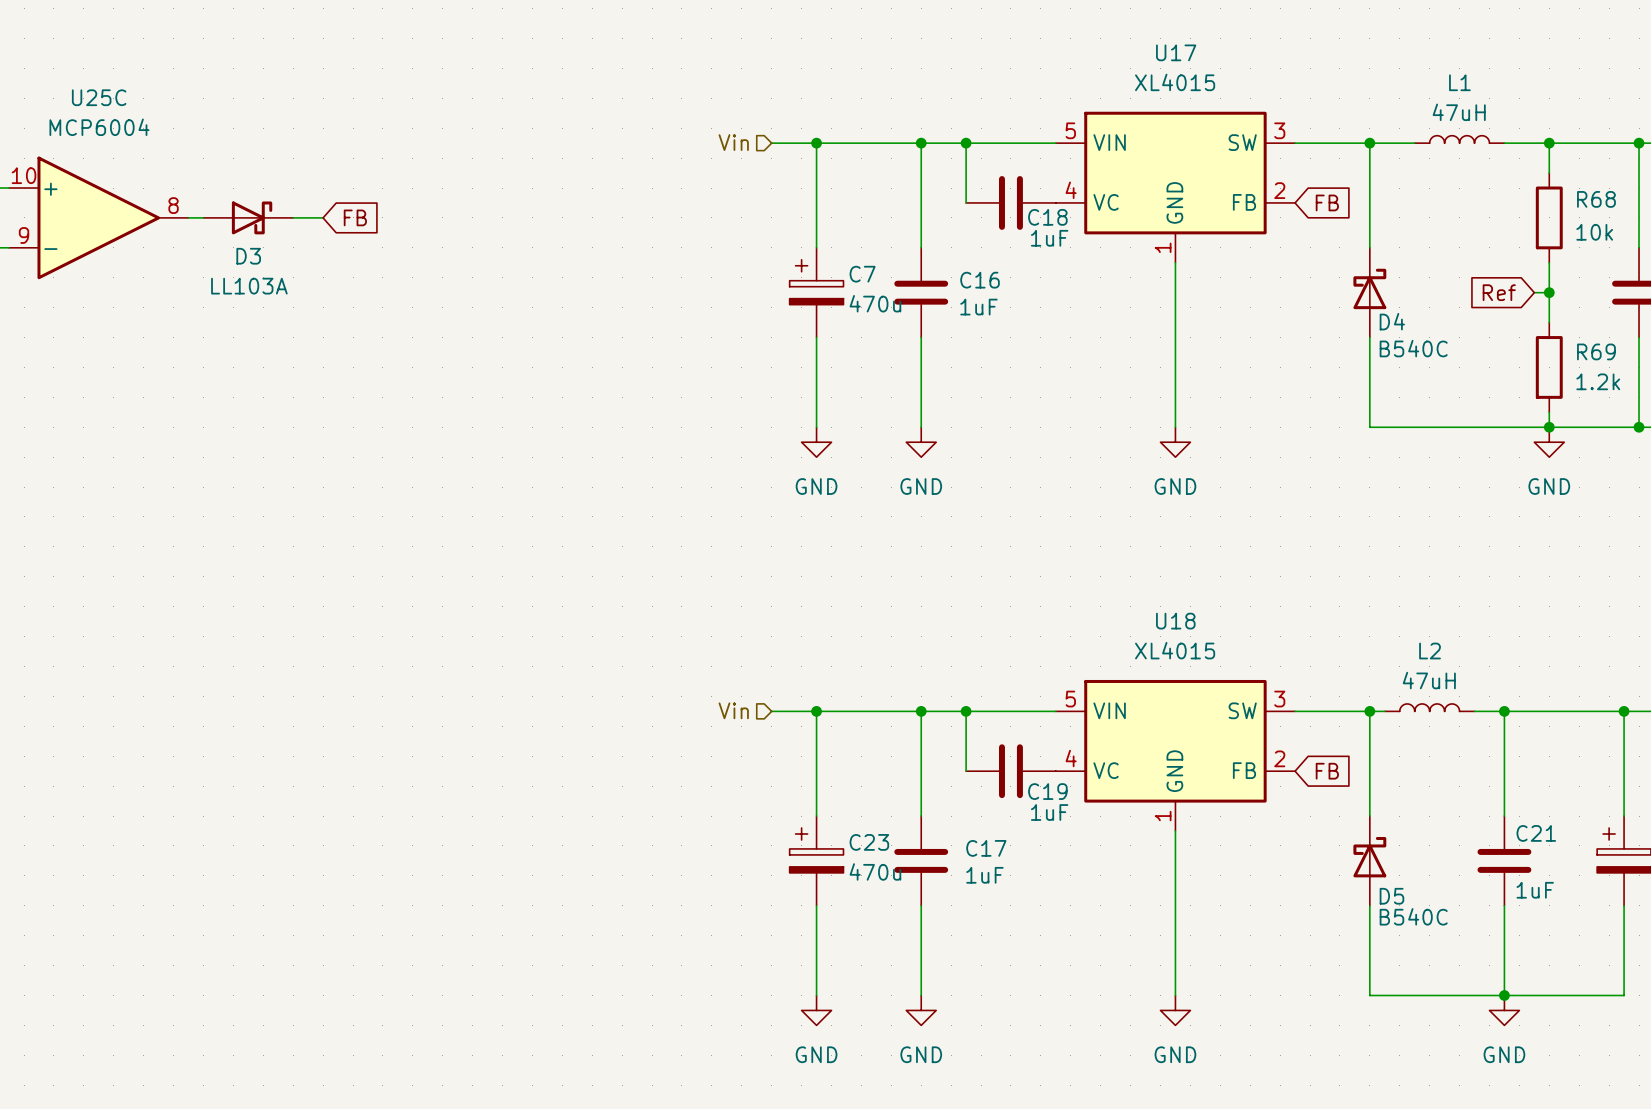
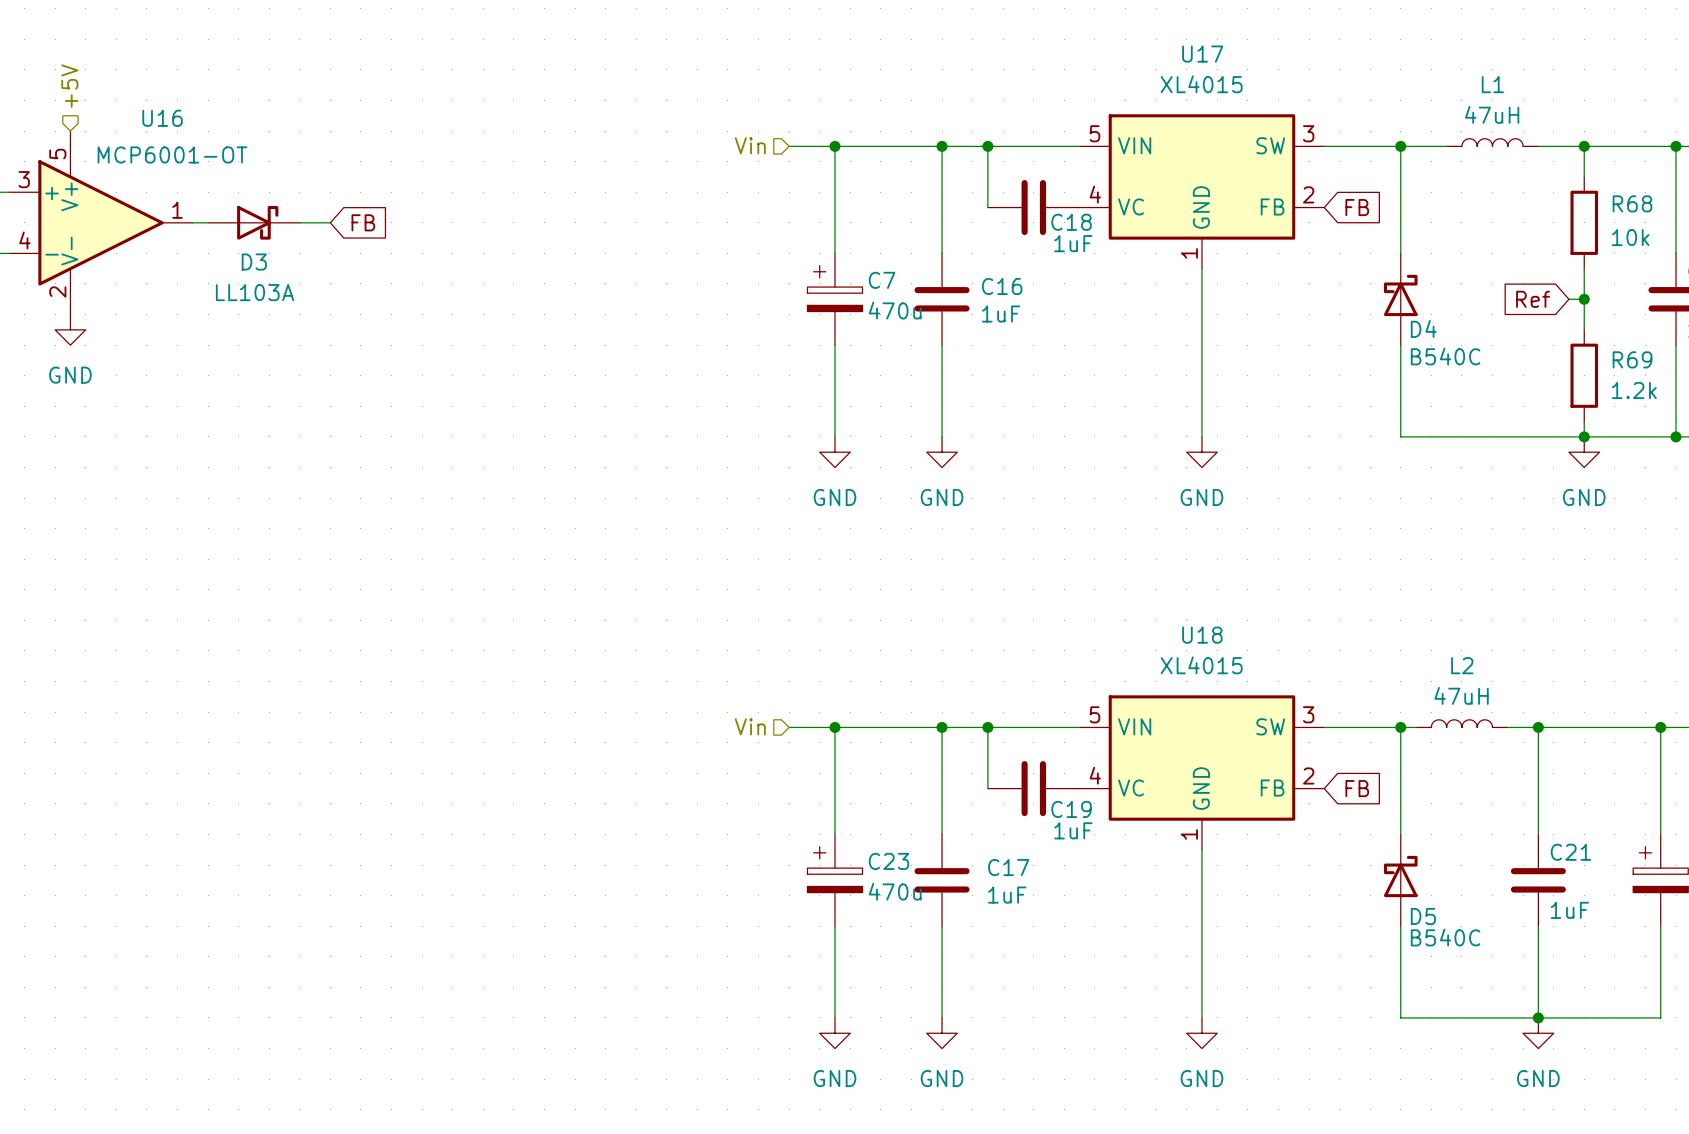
hierarchical label: none -> +5V (69, 86)
U25C: MCP6004 (98, 217) -> none
U16: none -> MCP6001-OT (101, 222)
power symbol: none -> GND (70, 329)

